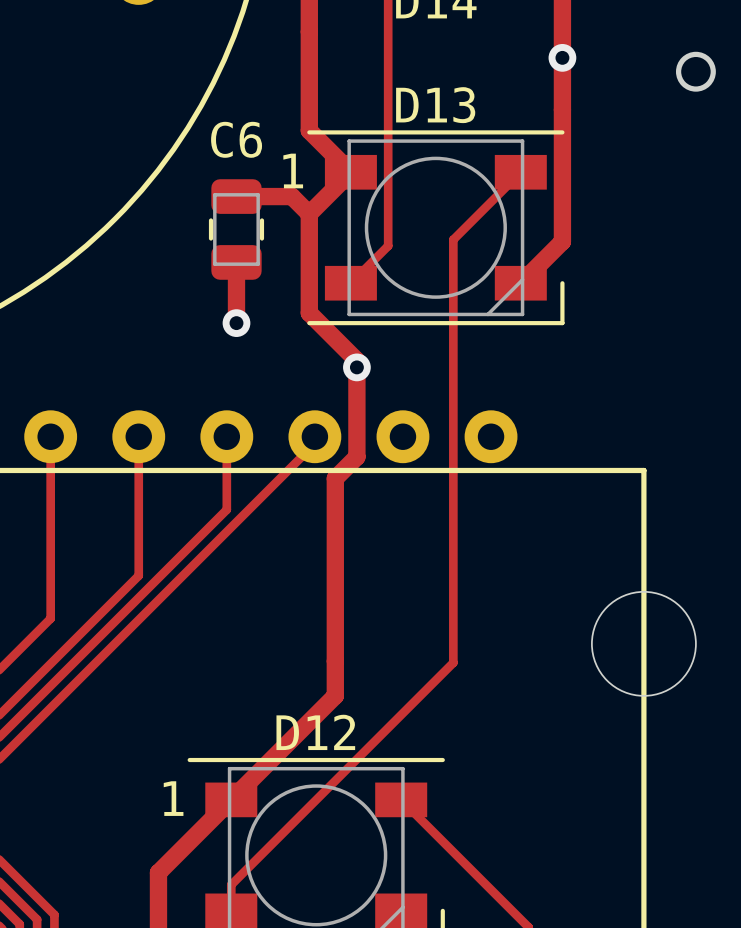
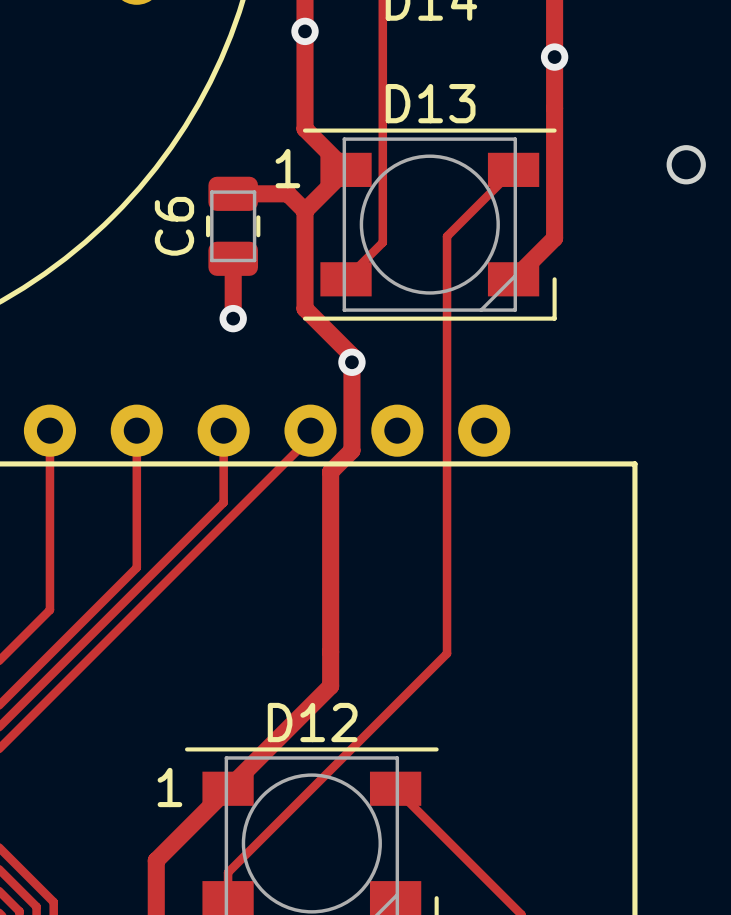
via: none -> (305, 31)
round board edge position: (695, 71) -> (686, 164)
C6 name rotation: 0° (236, 139) -> 90° counterclockwise (174, 226)
C6 name position: C6 (236, 139) -> C6 (174, 226)
round board edge: [591, 590, 697, 697] -> none

